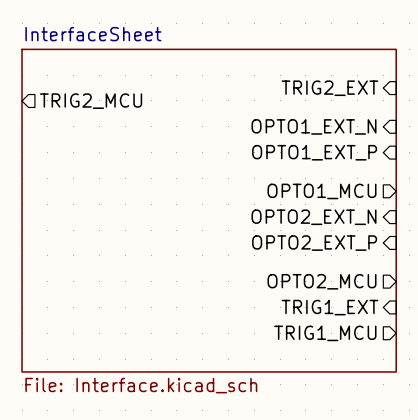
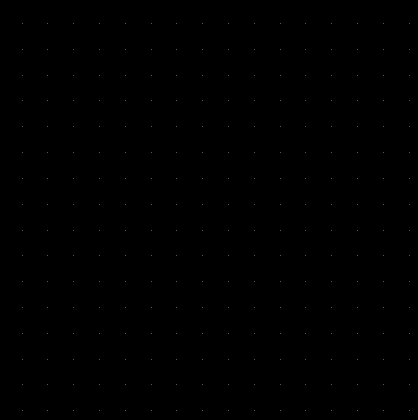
sheet pin: TRIG2_EXT (329, 88) -> none
sheet pin: TRIG2_MCU (91, 101) -> none
sheet pin: OPTO1_EXT_N (313, 126) -> none
sheet pin: OPTO1_EXT_P (314, 152) -> none
sheet pin: OPTO1_MCU (321, 191) -> none
sheet InterfaceSheet: File: Interface.kicad_sch (209, 210) -> none
sheet pin: OPTO2_EXT_N (313, 217) -> none
sheet pin: OPTO2_EXT_P (314, 243) -> none
sheet pin: OPTO2_MCU (321, 281) -> none
sheet pin: TRIG1_EXT (329, 307) -> none
sheet pin: TRIG1_MCU (325, 333) -> none

